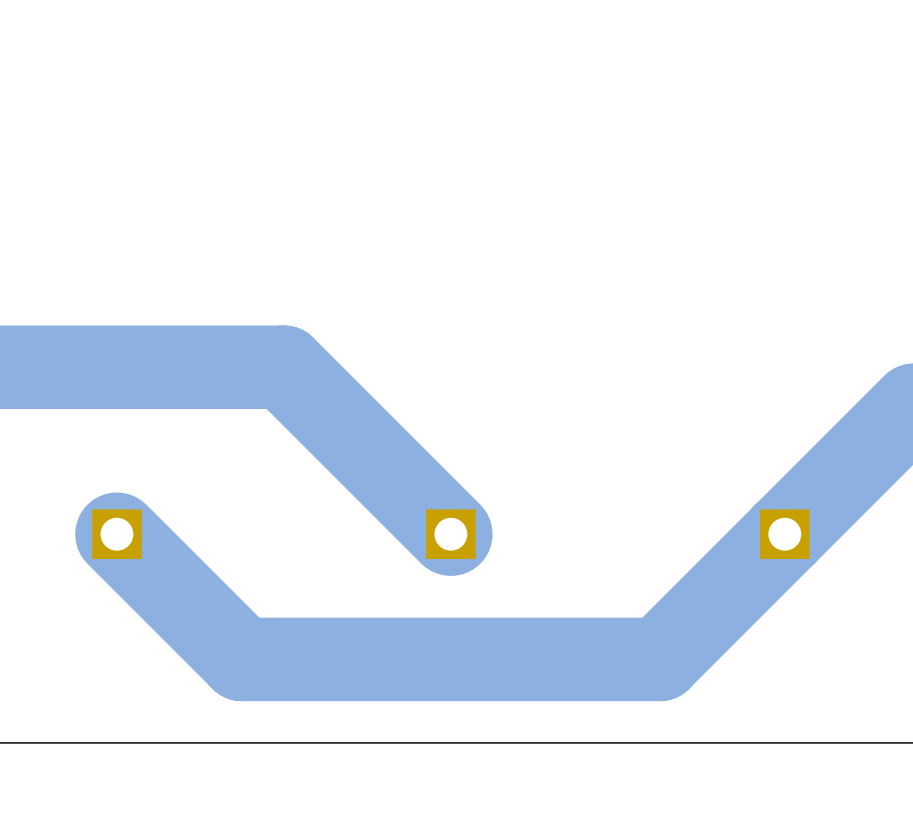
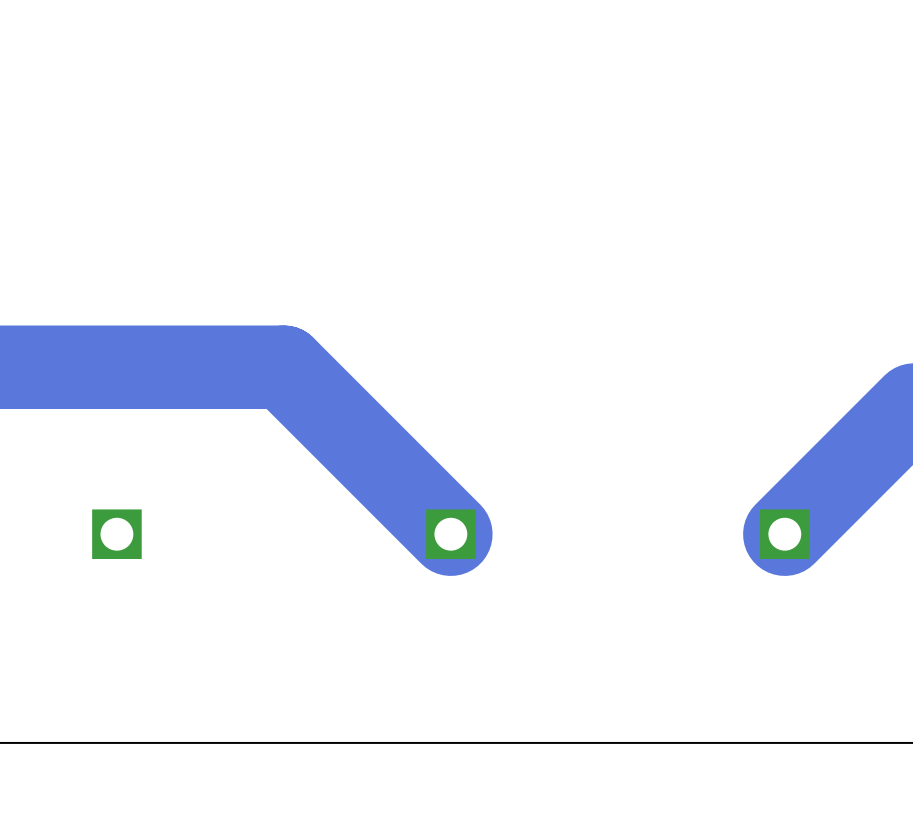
track: (784, 534) (659, 659) (242, 659) (116, 534) -> none

